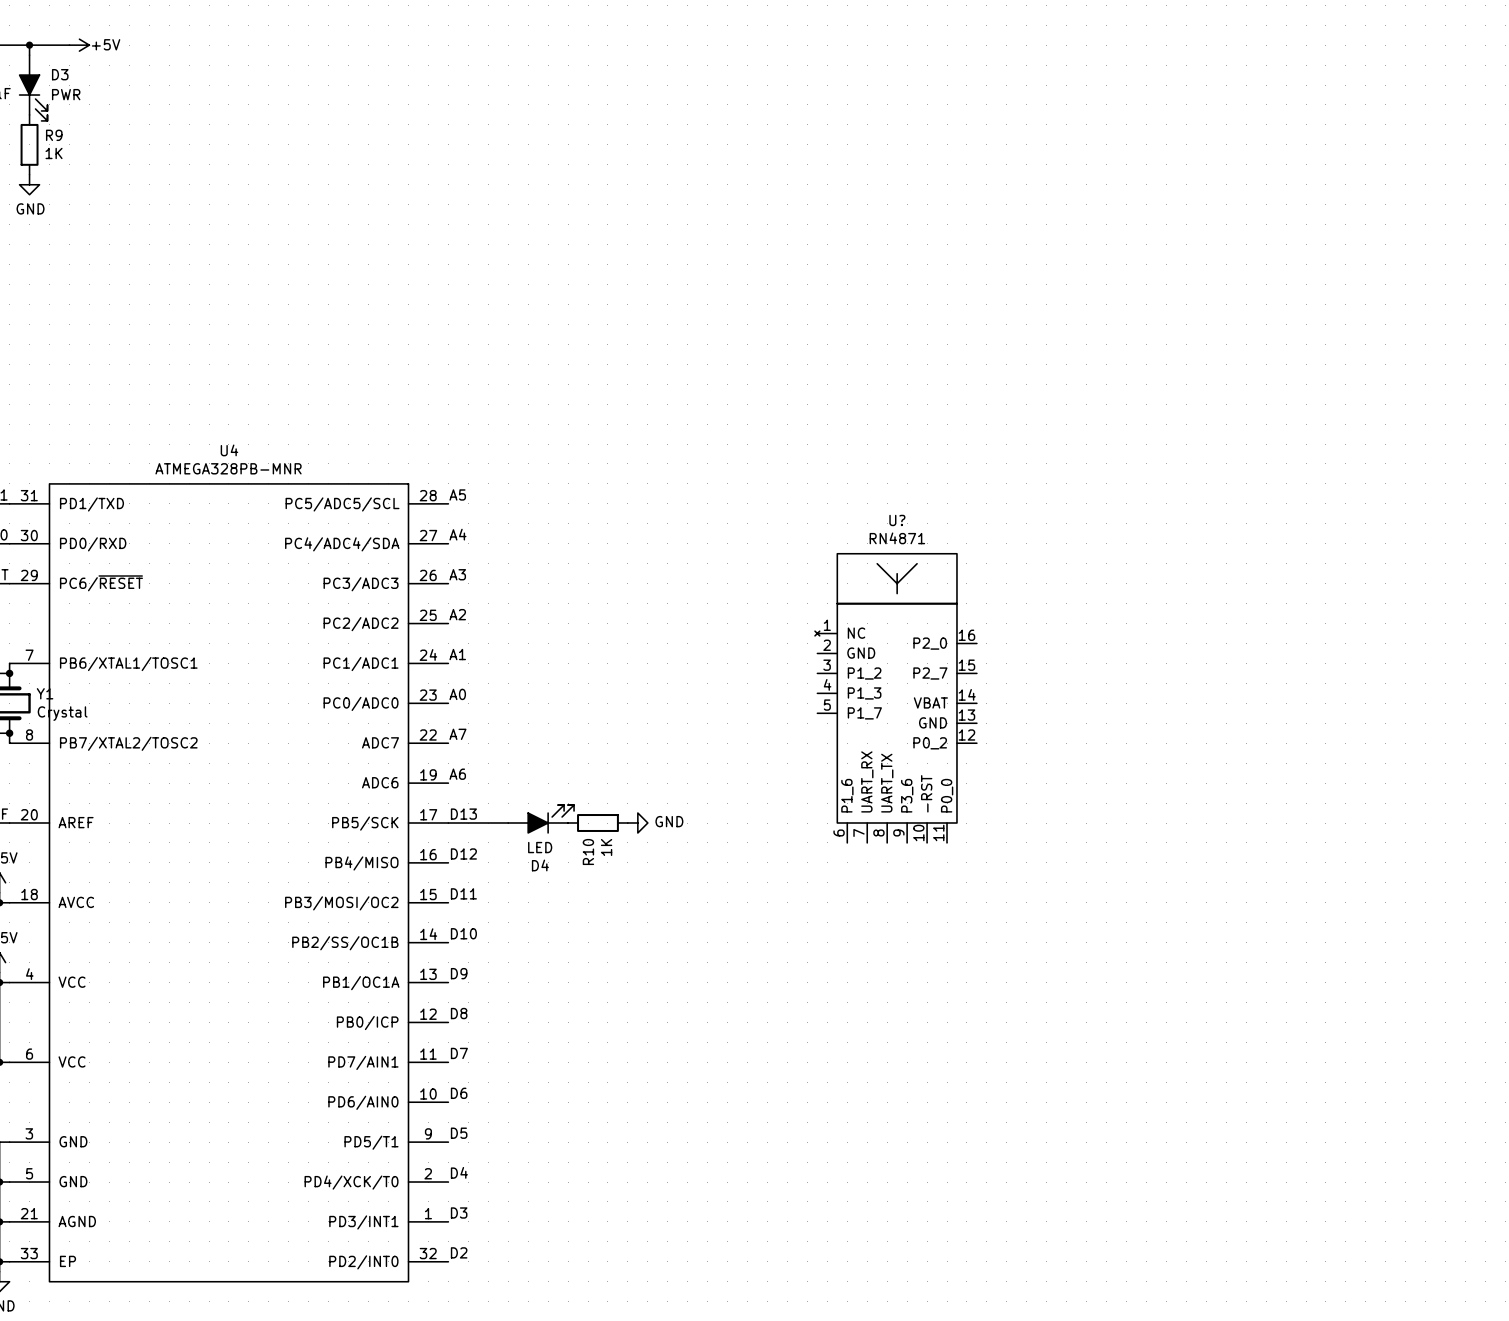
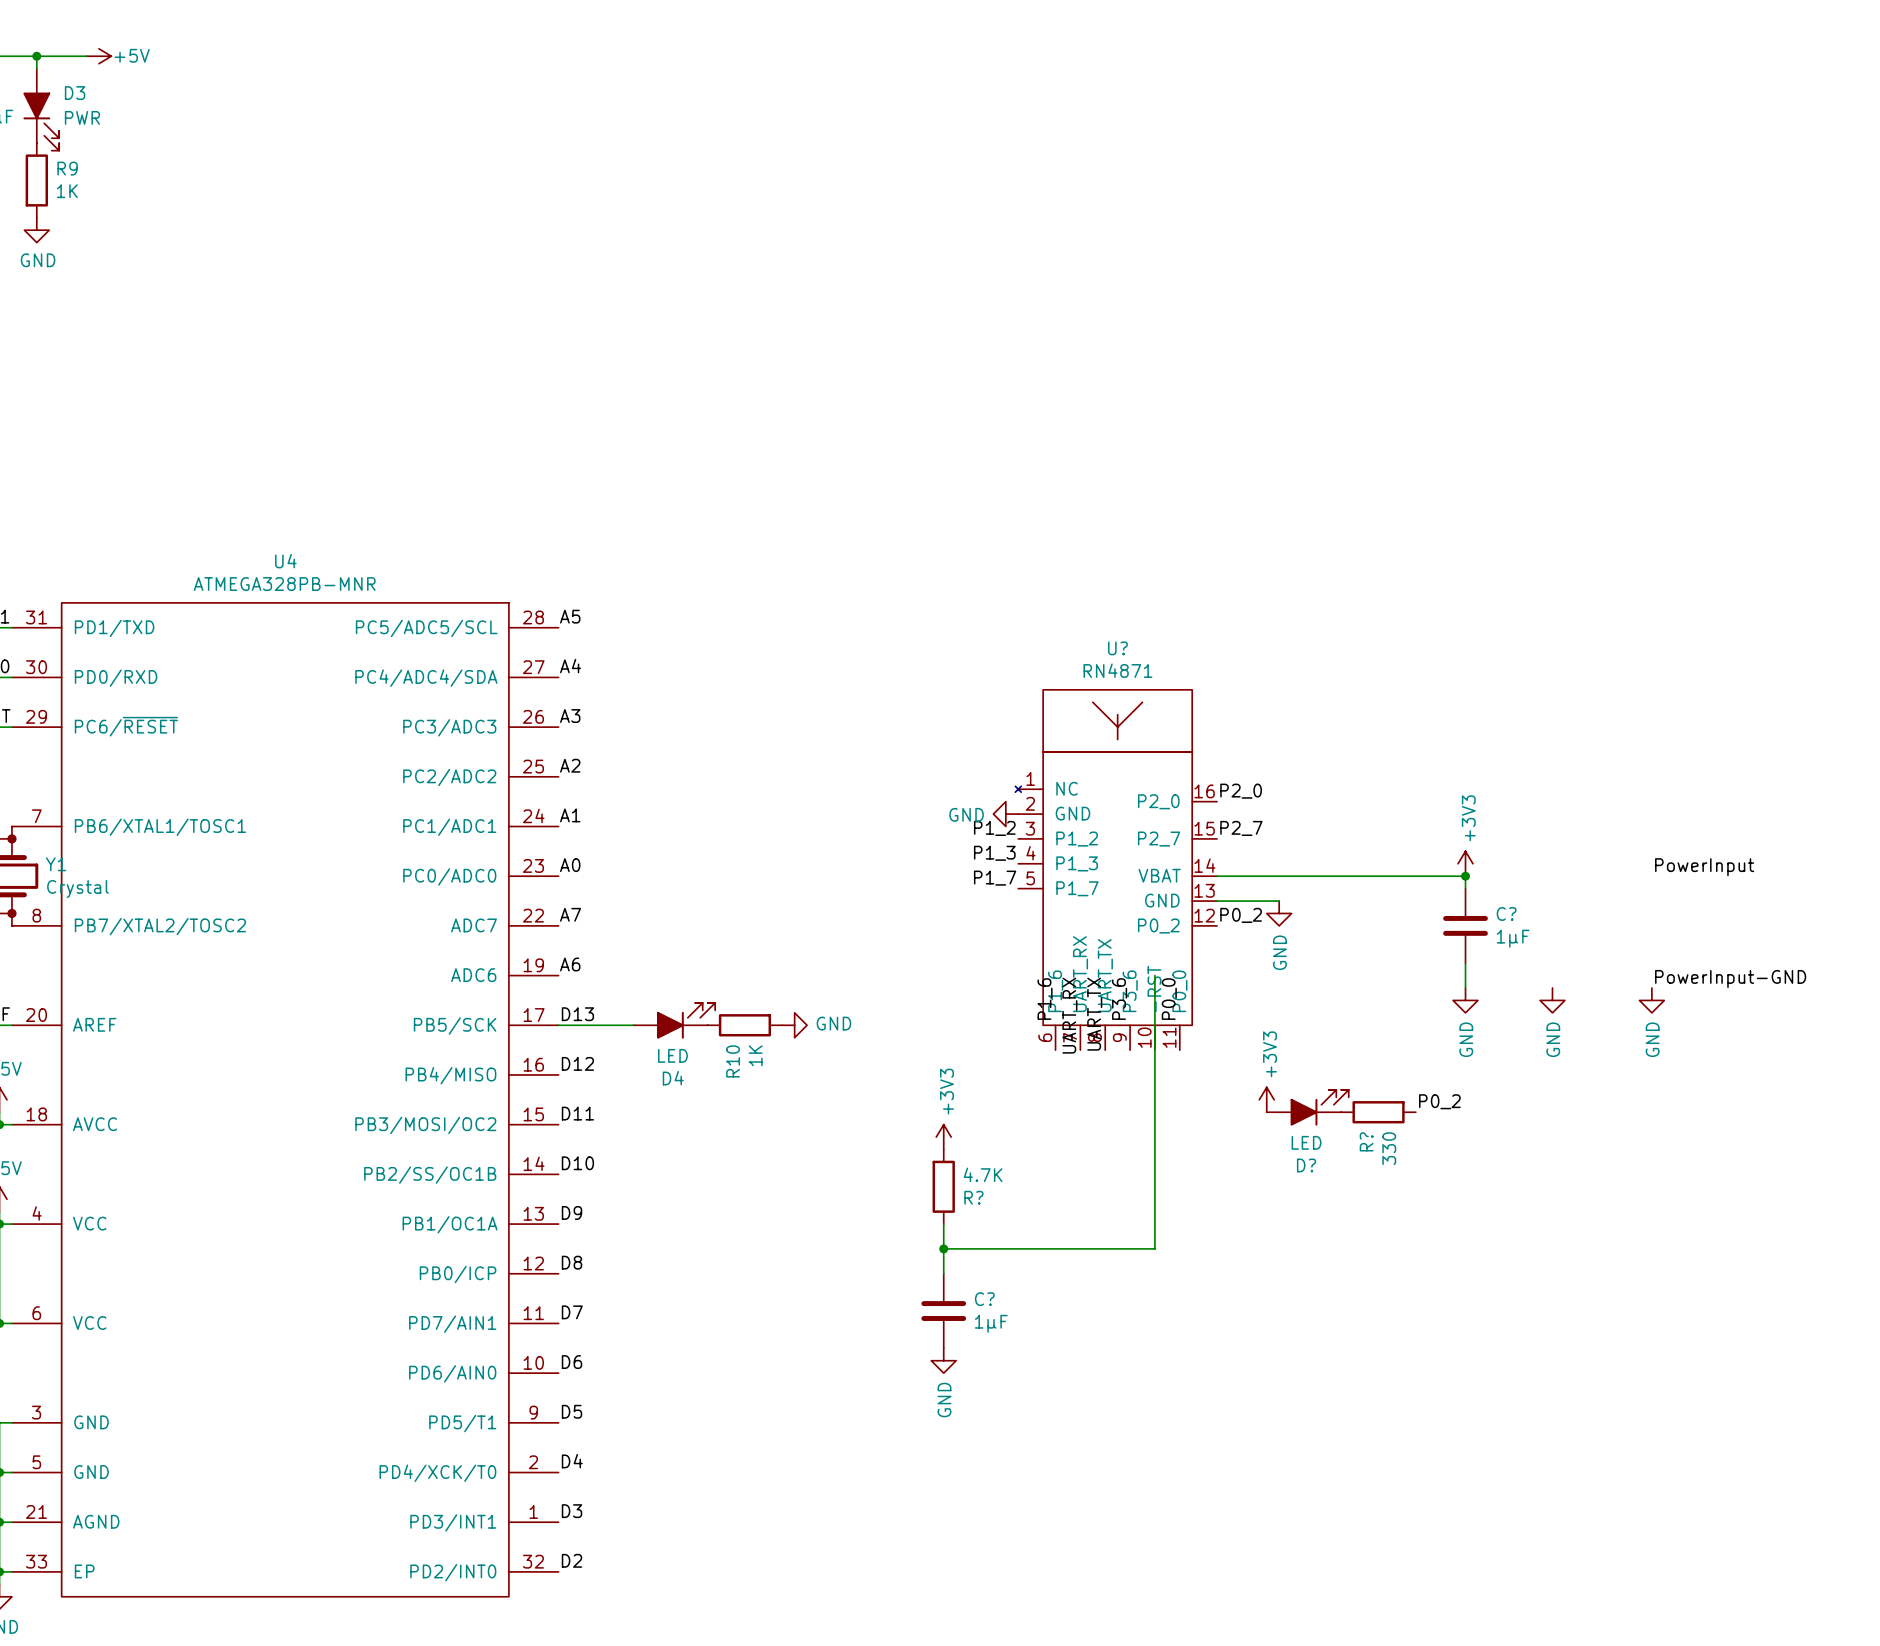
label: none -> P2_0 (1241, 791)
power symbol: none -> GND (1005, 814)
label: none -> P1_2 (994, 828)
label: none -> P2_7 (1241, 828)
label: none -> P1_3 (994, 853)
power symbol: none -> +3V3 (1465, 863)
label: none -> PowerInput (1704, 867)
wire: none -> (1217, 876) (1465, 876) (1465, 888)
junction: none -> (1465, 876)
label: none -> P1_7 (995, 878)
wire: none -> (1217, 901) (1279, 901)
power symbol: none -> GND (1279, 913)
label: none -> P0_2 (1241, 915)
C?: none -> 1µF (1465, 925)
wire: none -> (1465, 963) (1465, 988)
wire: none -> (1154, 975) (1154, 1248) (943, 1248)
label: none -> PowerInput-GND (1730, 979)
label: none -> P1_6 (1045, 999)
label: none -> P3_6 (1119, 999)
label: none -> P0_0 (1169, 999)
power symbol: none -> GND (1465, 1000)
power symbol: none -> GND (1552, 1000)
power symbol: none -> GND (1651, 1000)
label: none -> UART_TX (1094, 1014)
label: none -> UART_RX (1069, 1015)
power symbol: none -> +3V3 (1266, 1099)
label: none -> P0_2 (1439, 1101)
D?: none -> LED (1307, 1107)
R?: none -> 330 (1378, 1112)
power symbol: none -> +3V3 (943, 1137)
R?: none -> 4.7K (943, 1186)
wire: none -> (943, 1224) (943, 1273)
junction: none -> (943, 1248)
C?: none -> 1µF (943, 1311)
power symbol: none -> GND (943, 1360)

